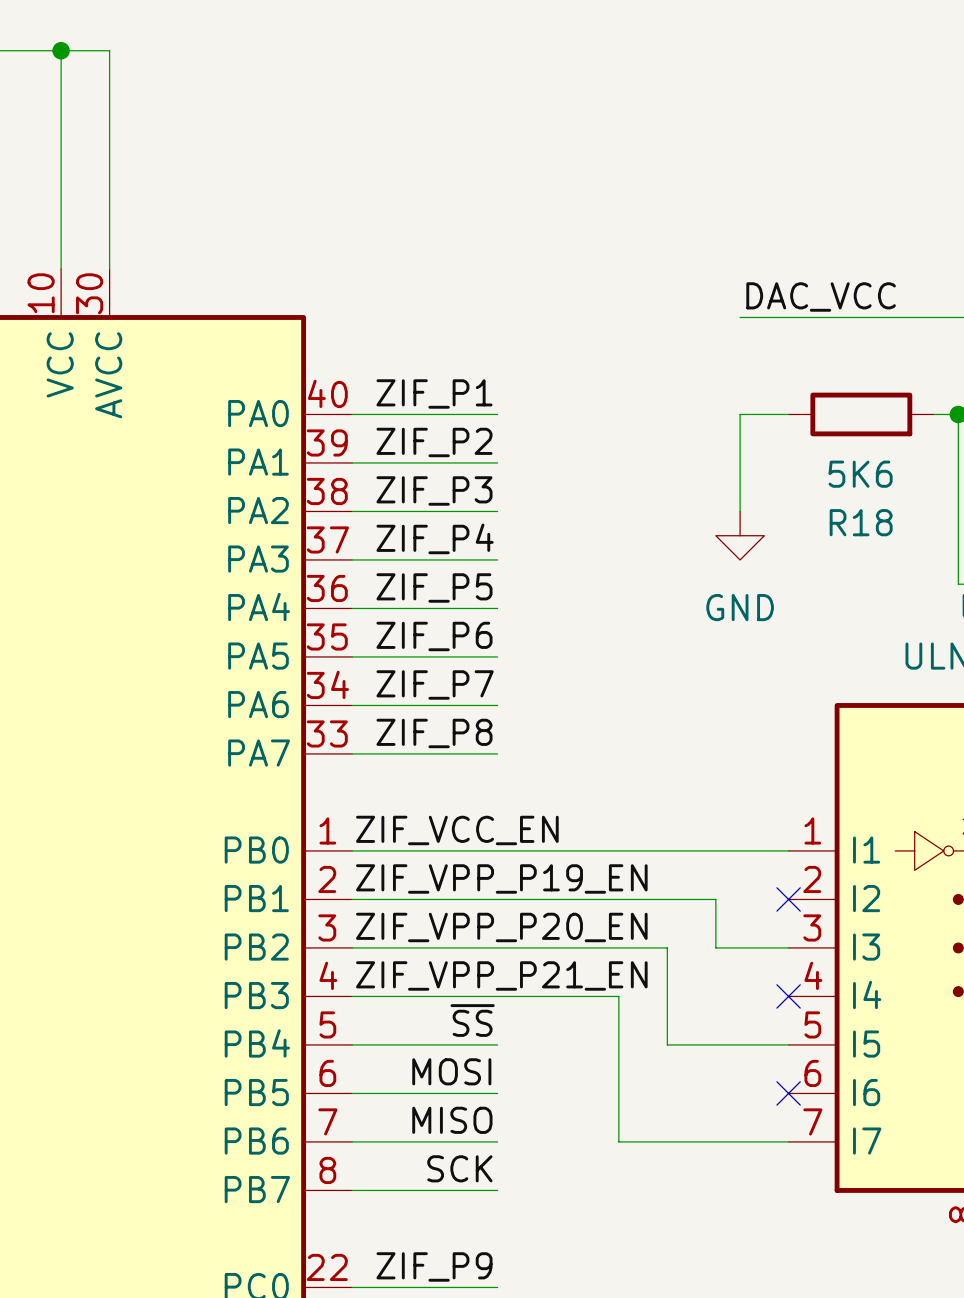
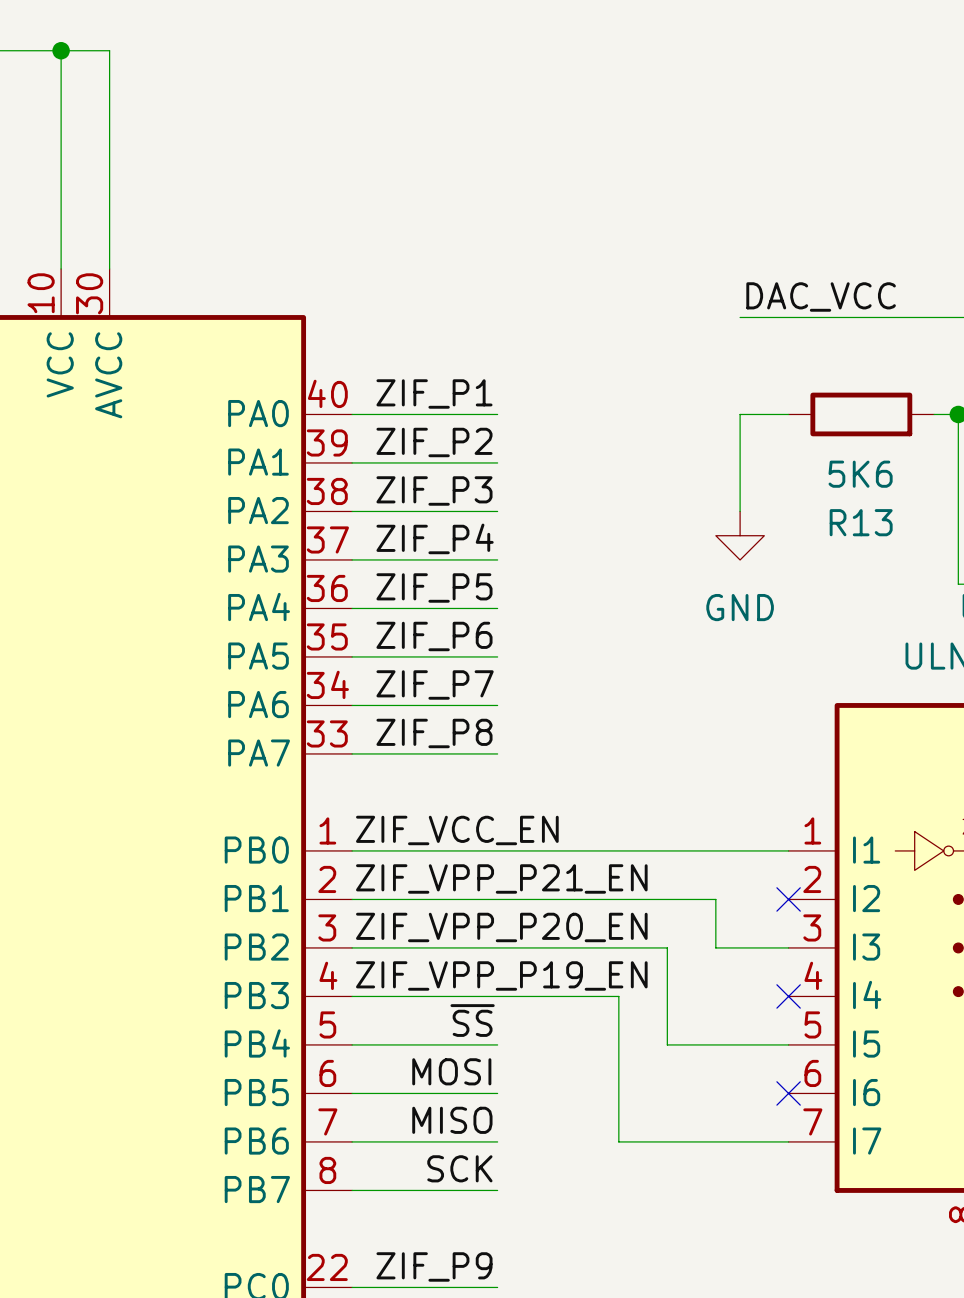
R18 name: R18 (861, 522) -> R13 (861, 522)
label: ZIF_VPP_P19_EN (501, 878) -> ZIF_VPP_P21_EN (501, 878)
label: ZIF_VPP_P21_EN (501, 975) -> ZIF_VPP_P19_EN (501, 975)

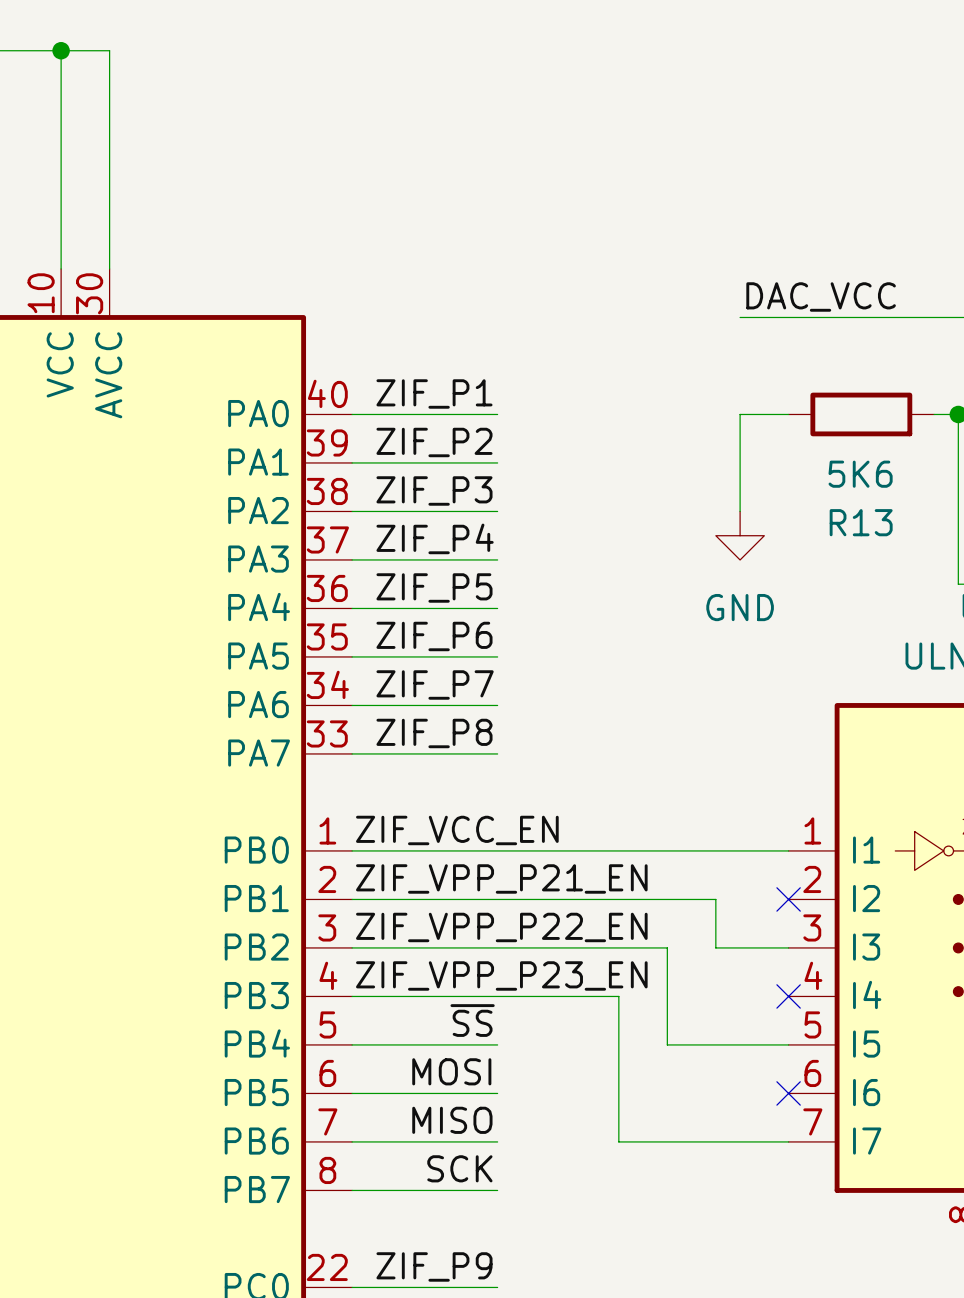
label: ZIF_VPP_P20_EN (501, 927) -> ZIF_VPP_P22_EN (501, 927)
label: ZIF_VPP_P19_EN (501, 975) -> ZIF_VPP_P23_EN (501, 975)

